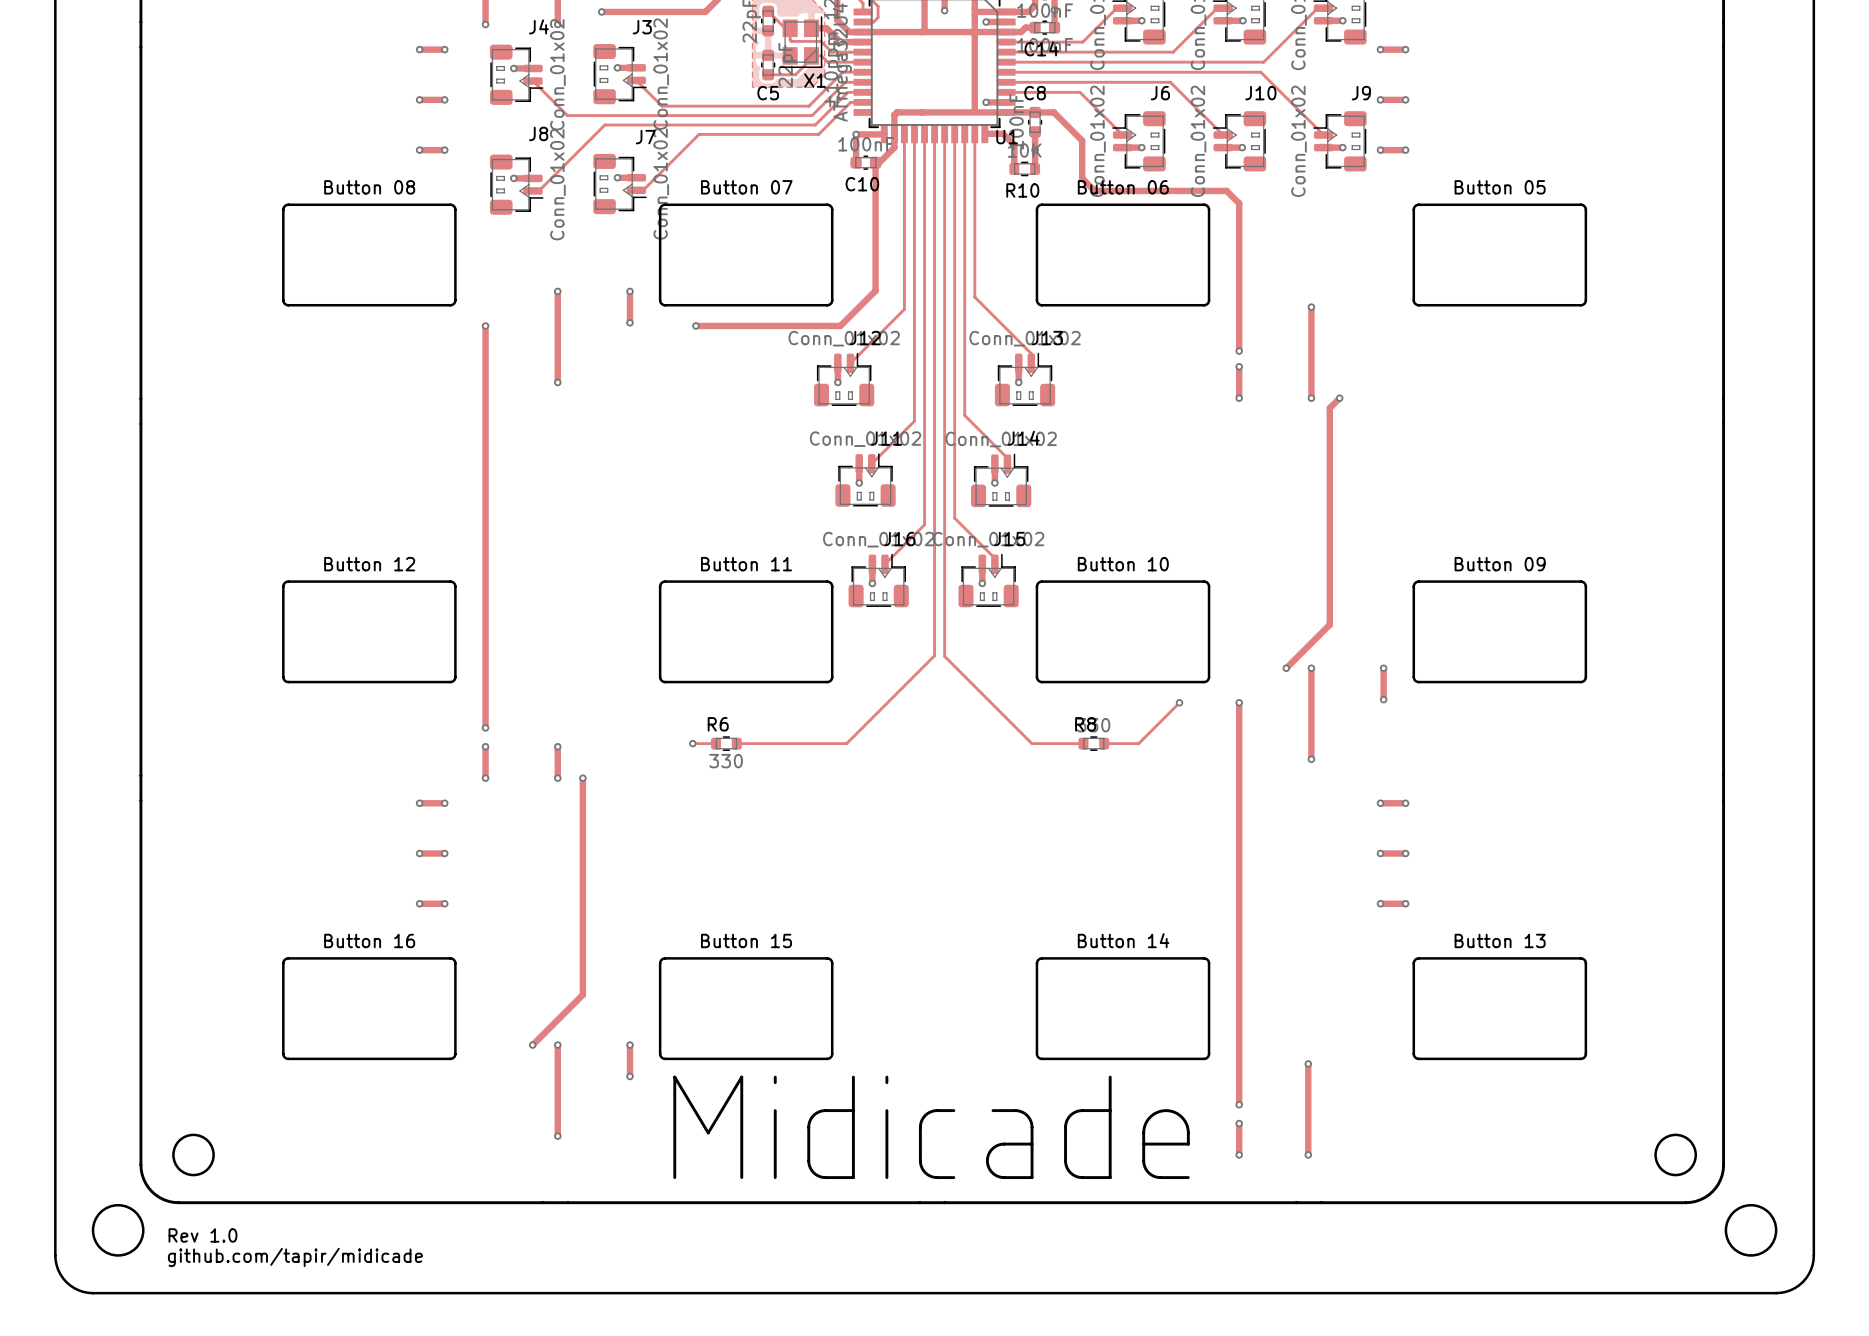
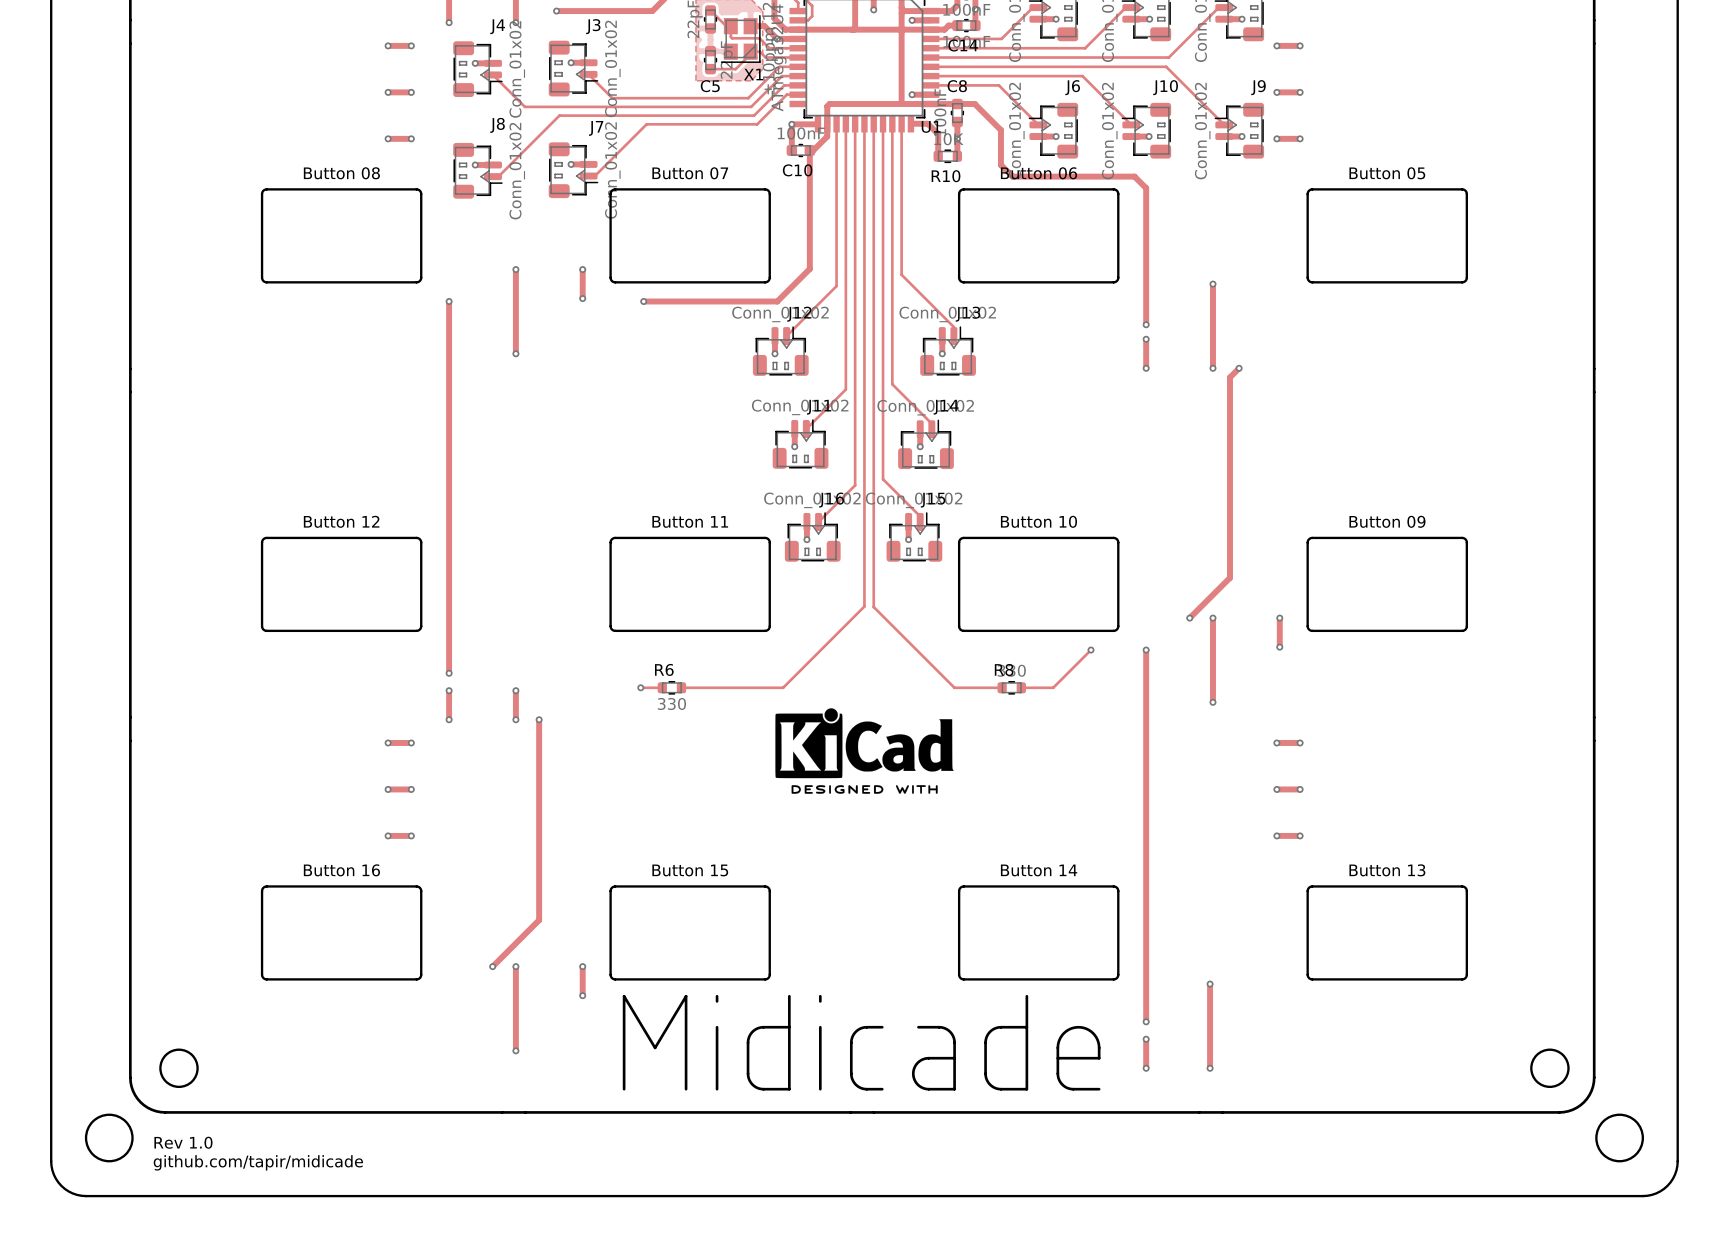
drawing: none -> [775, 708, 954, 794]

